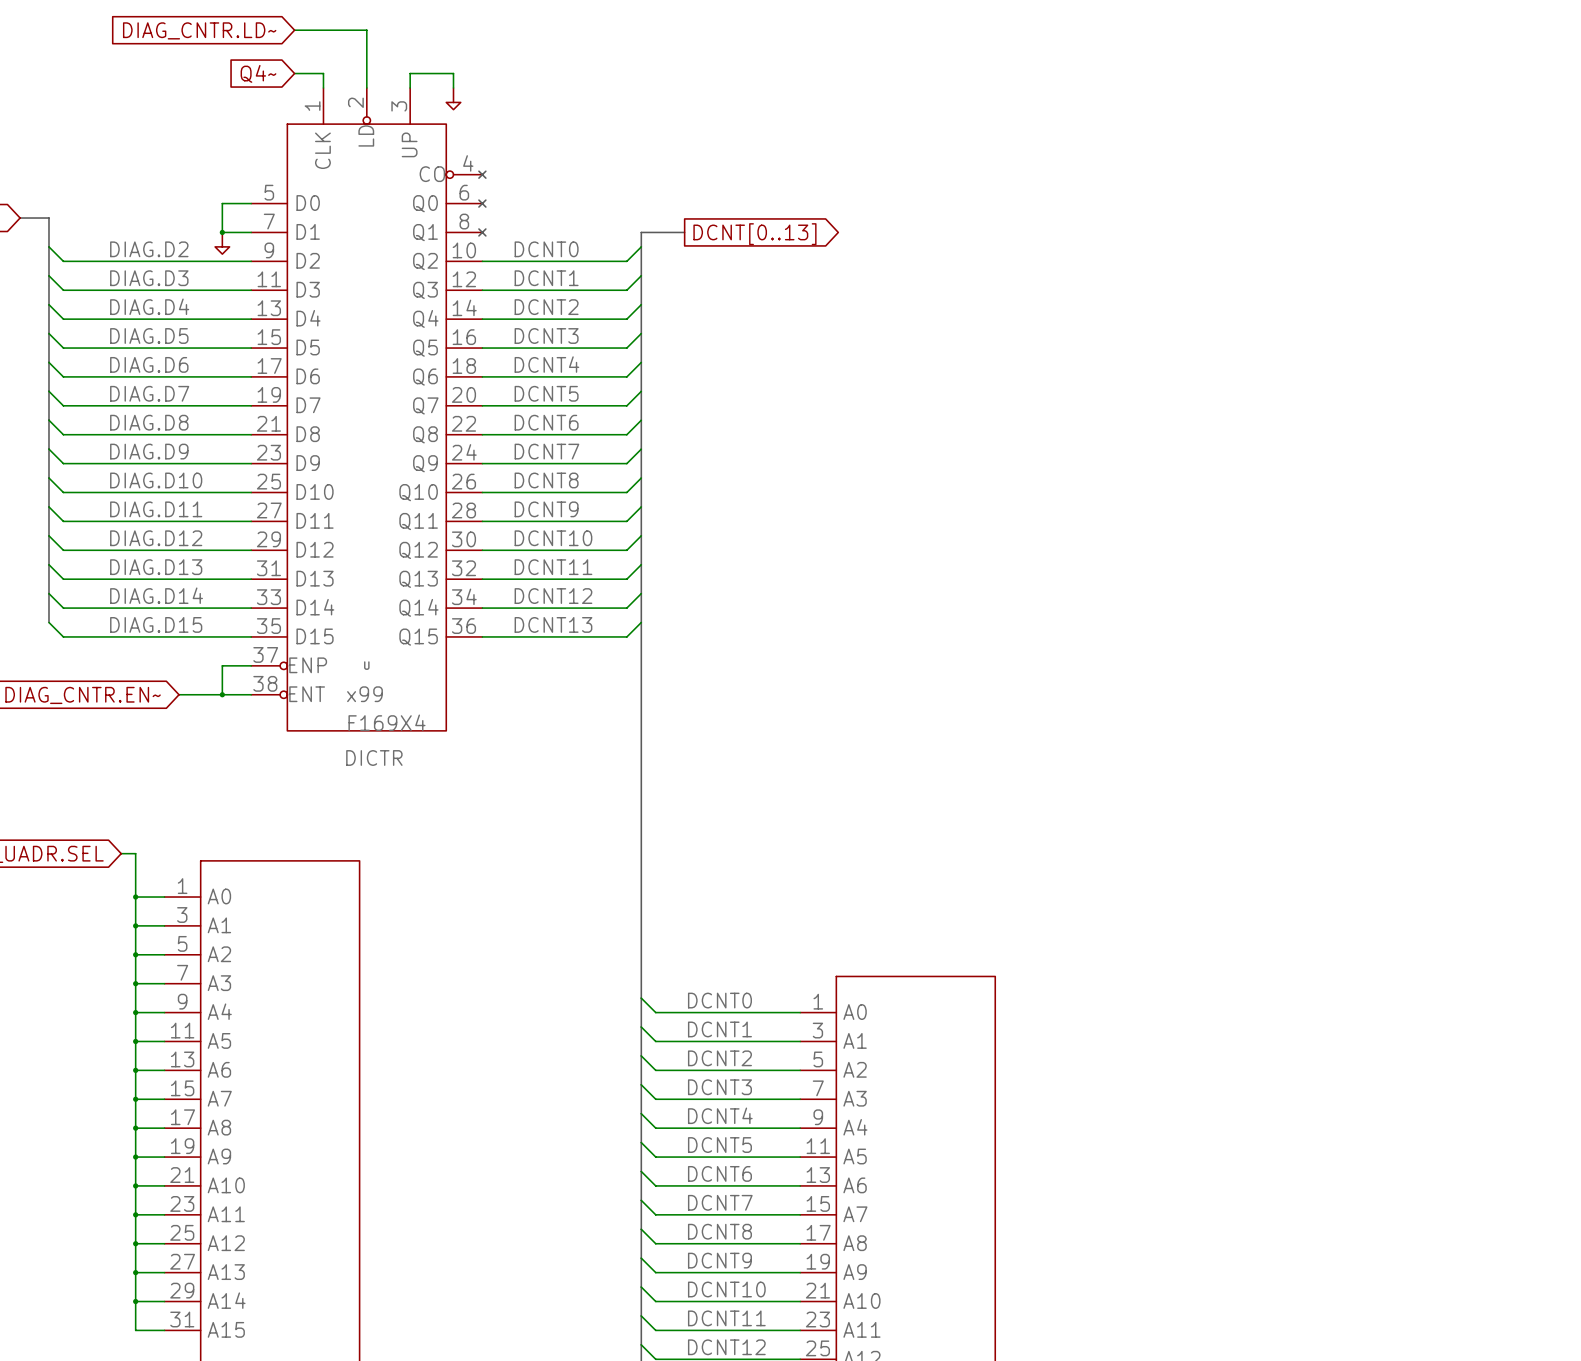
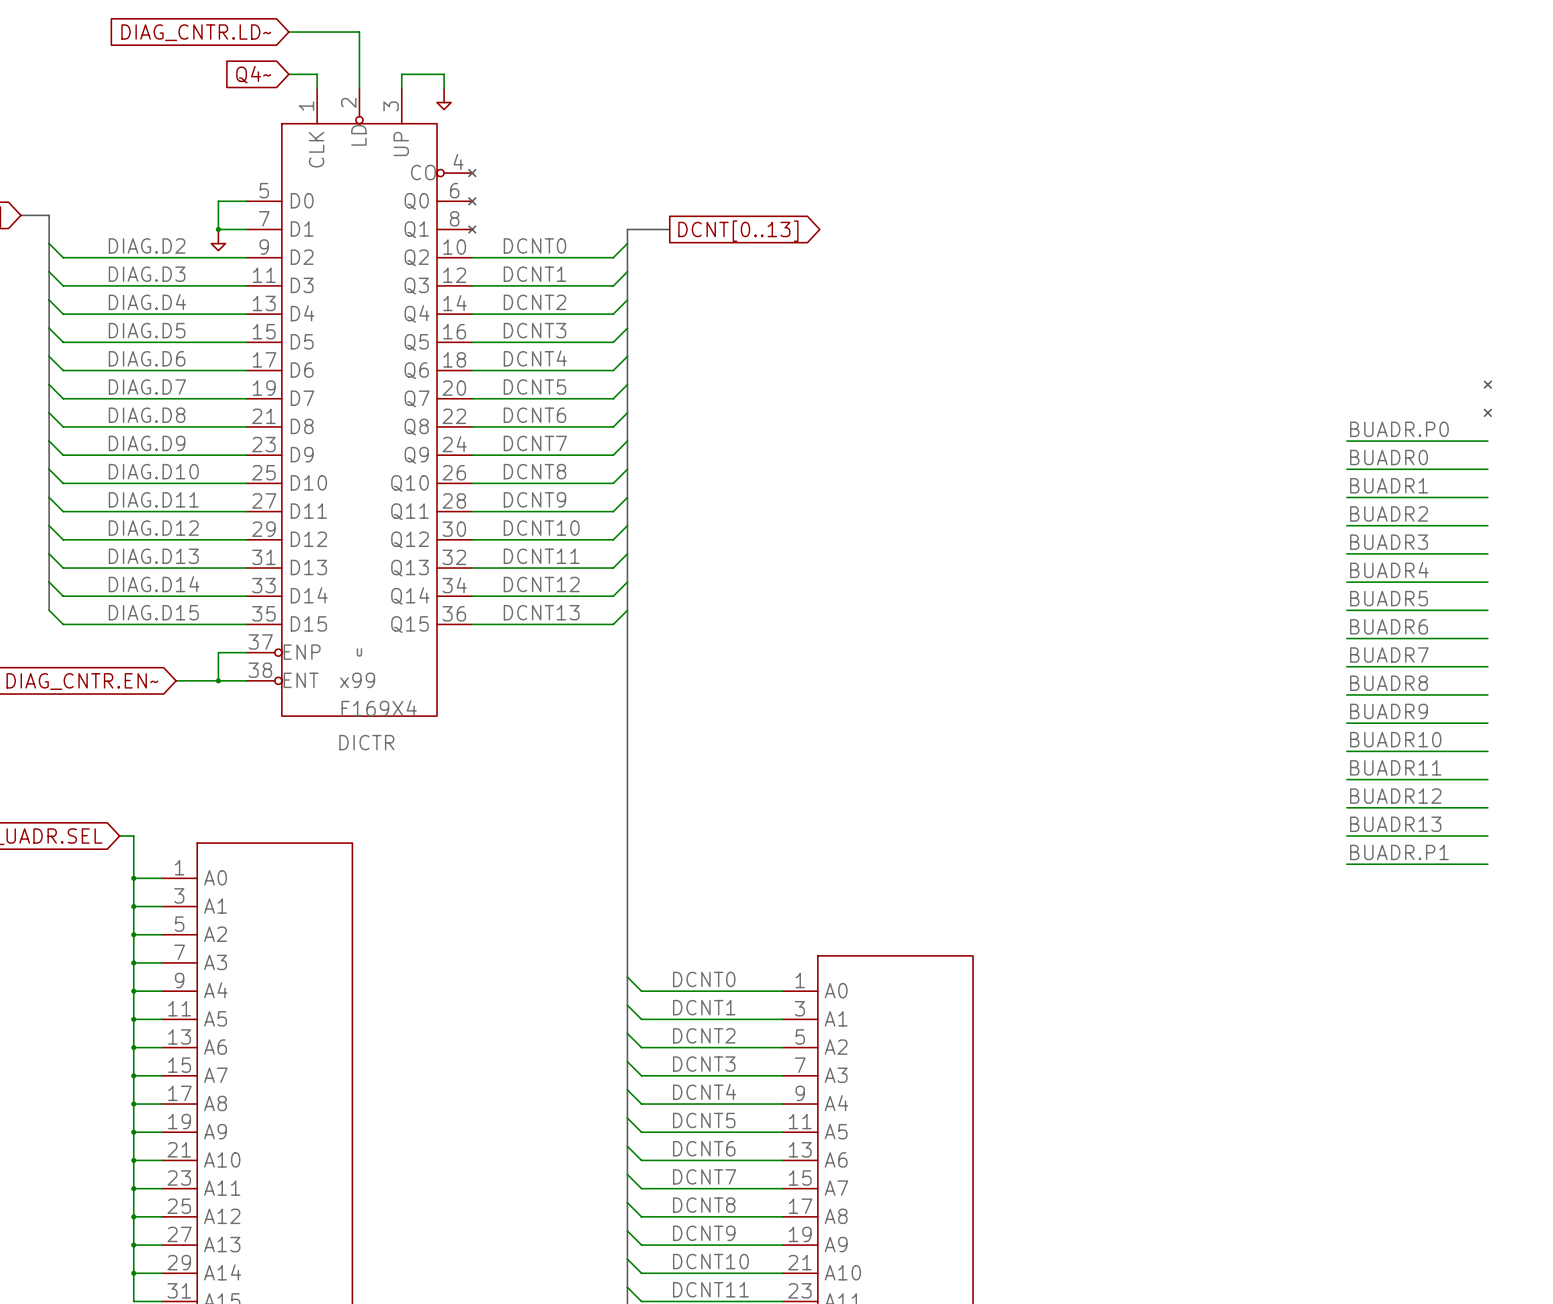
no-connect mark: none -> (1487, 384)
no-connect mark: none -> (1487, 412)
label: none -> BUADR.P0 (1399, 429)
wire: none -> (1346, 441) (1487, 441)
label: none -> BUADR0 (1389, 457)
wire: none -> (1346, 469) (1487, 469)
label: none -> BUADR1 (1389, 485)
wire: none -> (1346, 497) (1487, 497)
label: none -> BUADR2 (1389, 513)
wire: none -> (1346, 525) (1487, 525)
label: none -> BUADR3 (1389, 542)
wire: none -> (1346, 553) (1487, 553)
label: none -> BUADR4 (1389, 570)
wire: none -> (1346, 582) (1487, 582)
label: none -> BUADR5 (1389, 598)
wire: none -> (1346, 610) (1487, 610)
label: none -> BUADR6 (1389, 626)
wire: none -> (1346, 638) (1487, 638)
label: none -> BUADR7 (1389, 655)
wire: none -> (1346, 666) (1487, 666)
label: none -> BUADR8 (1389, 683)
wire: none -> (1346, 694) (1487, 694)
label: none -> BUADR9 (1389, 711)
wire: none -> (1346, 723) (1487, 723)
label: none -> BUADR10 (1395, 739)
wire: none -> (1346, 751) (1487, 751)
label: none -> BUADR11 (1395, 767)
wire: none -> (1346, 779) (1487, 779)
label: none -> BUADR12 (1395, 796)
wire: none -> (1346, 807) (1487, 807)
label: none -> BUADR13 (1395, 824)
wire: none -> (1346, 836) (1487, 836)
label: none -> BUADR.P1 (1399, 852)
wire: none -> (1346, 864) (1487, 864)

